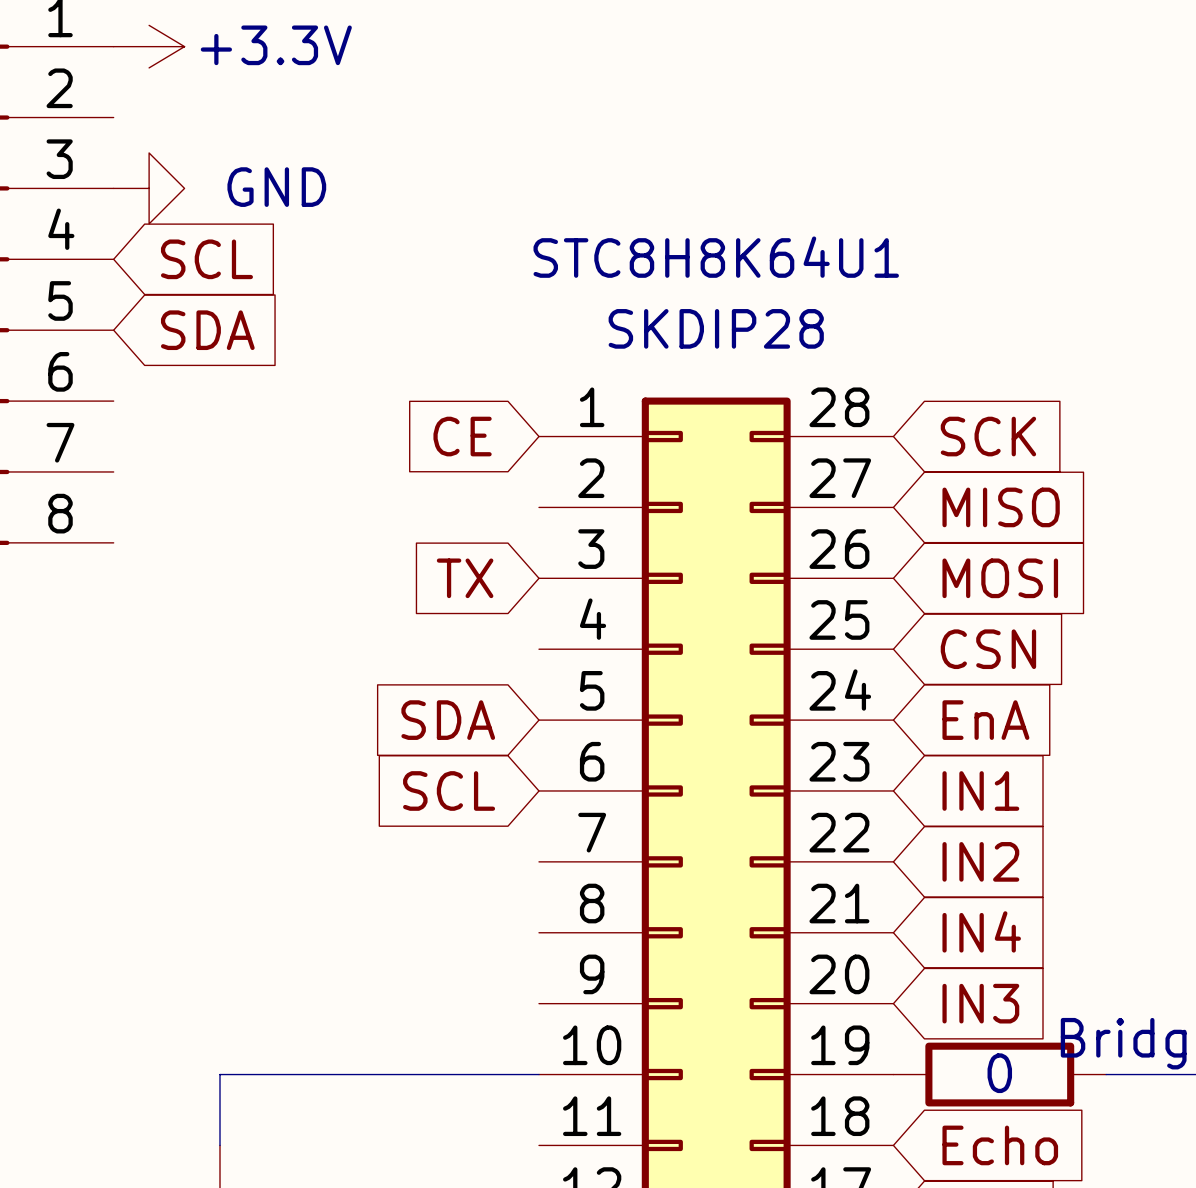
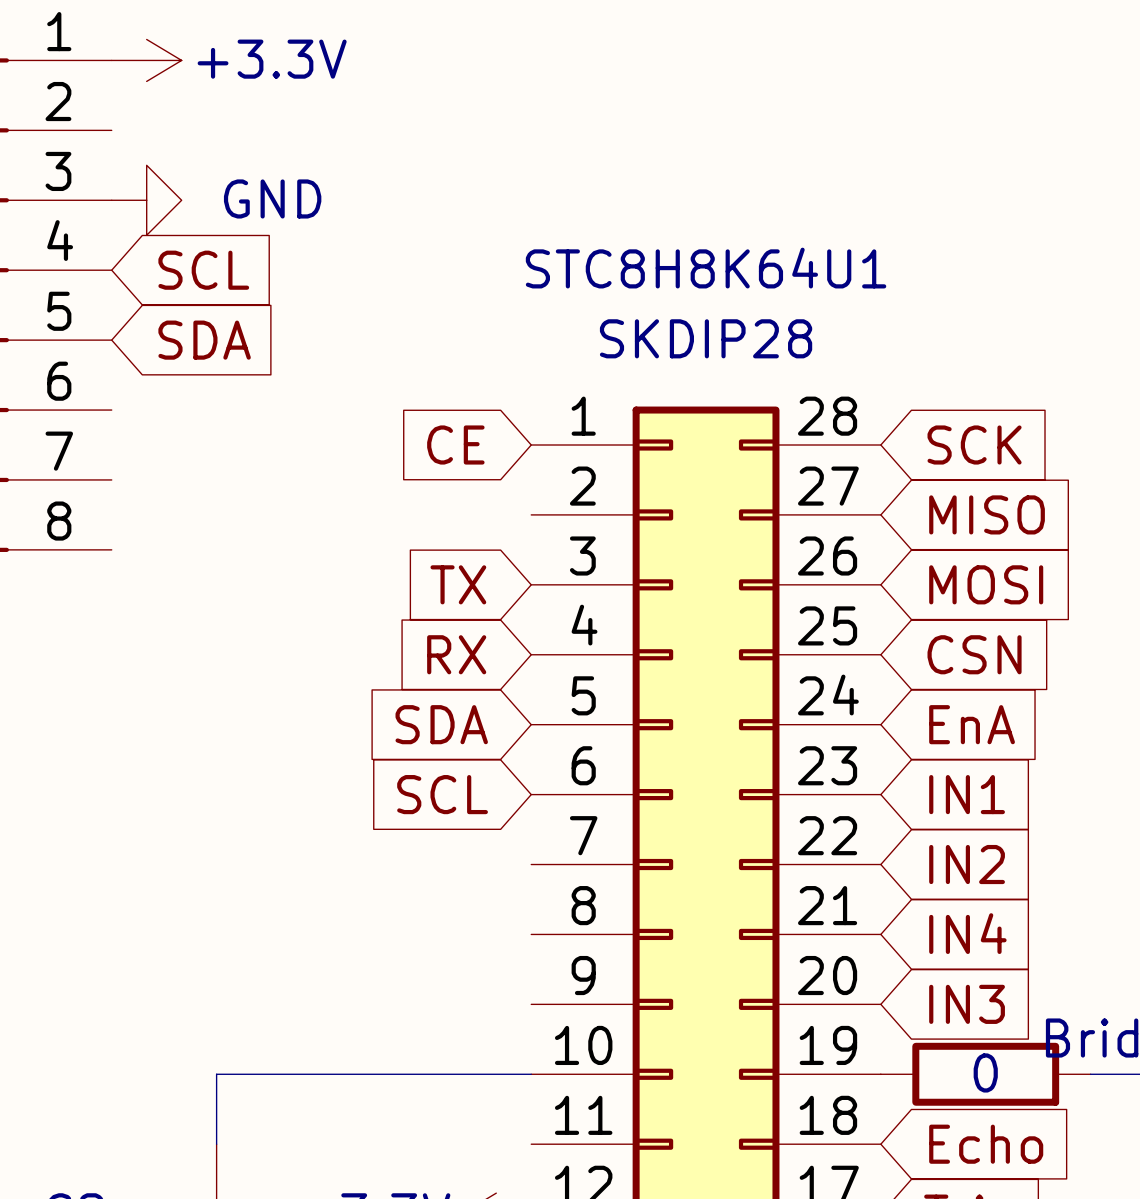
global label: none -> RX (456, 654)

